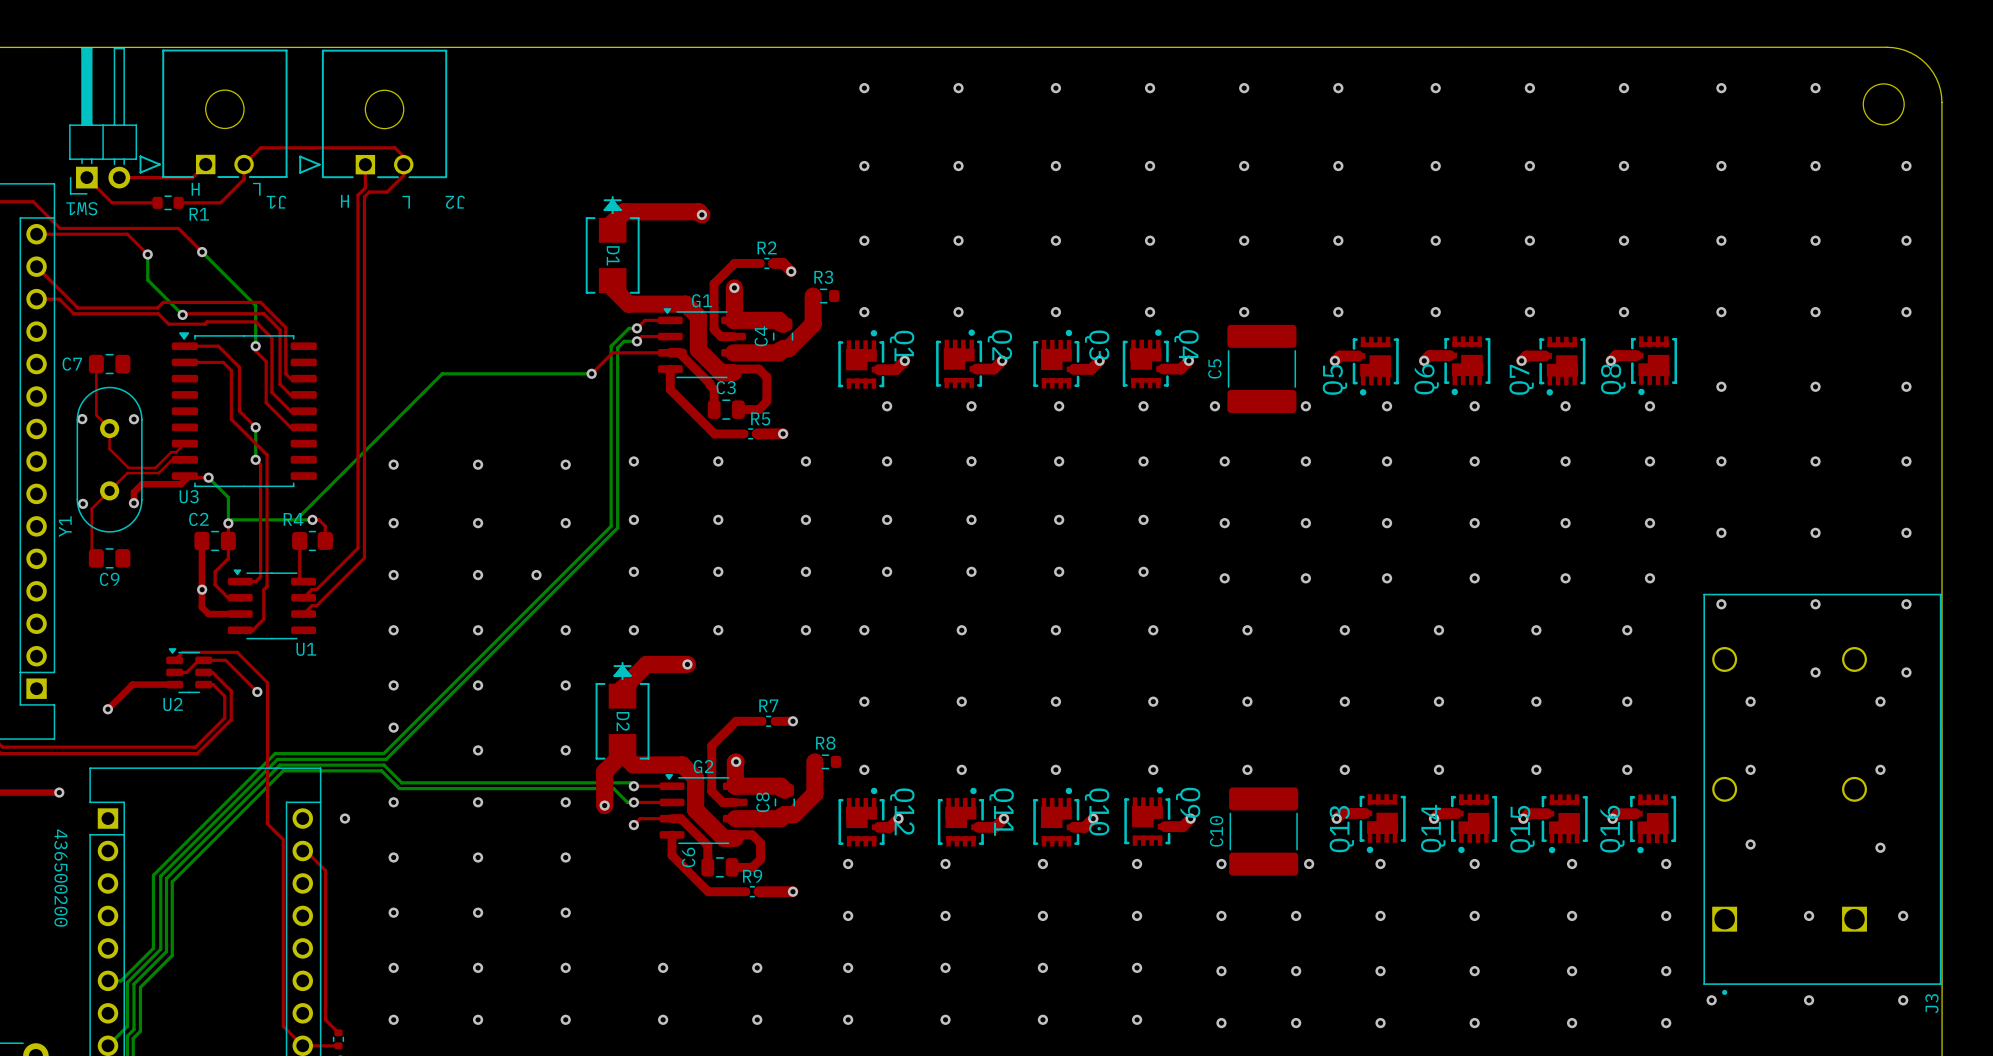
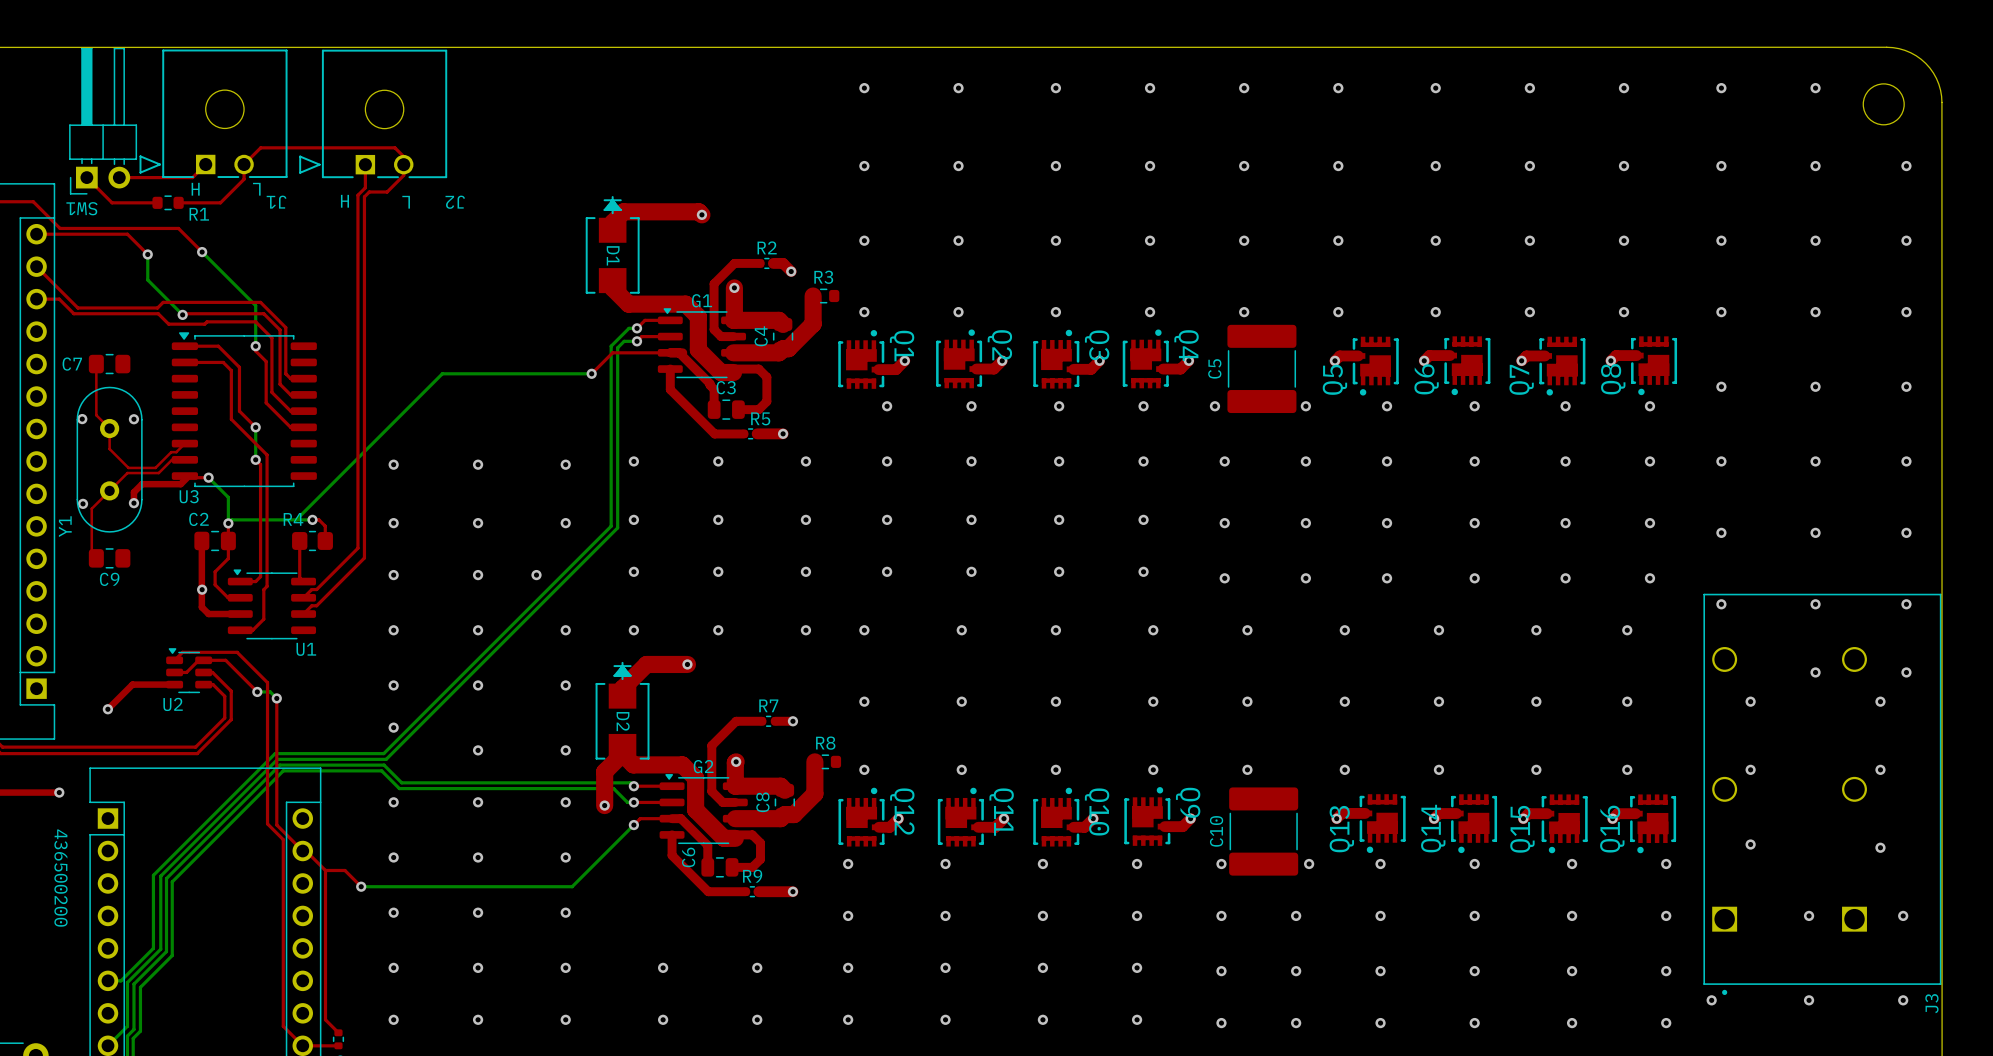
bottom track: none -> (257, 691) (270, 691) (276, 698)
top track: none -> (276, 698) (276, 825) (302, 851)
via: none -> (276, 698)
via: (344, 818) -> none
bottom track: none -> (633, 825) (572, 886) (361, 886)
top track: none -> (325, 870) (344, 870) (361, 886)
via: none -> (361, 886)

